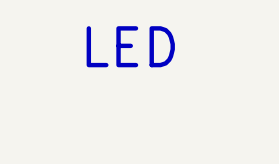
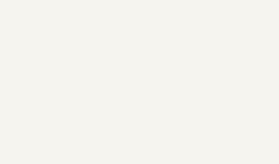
text: LED (130, 46) -> none

